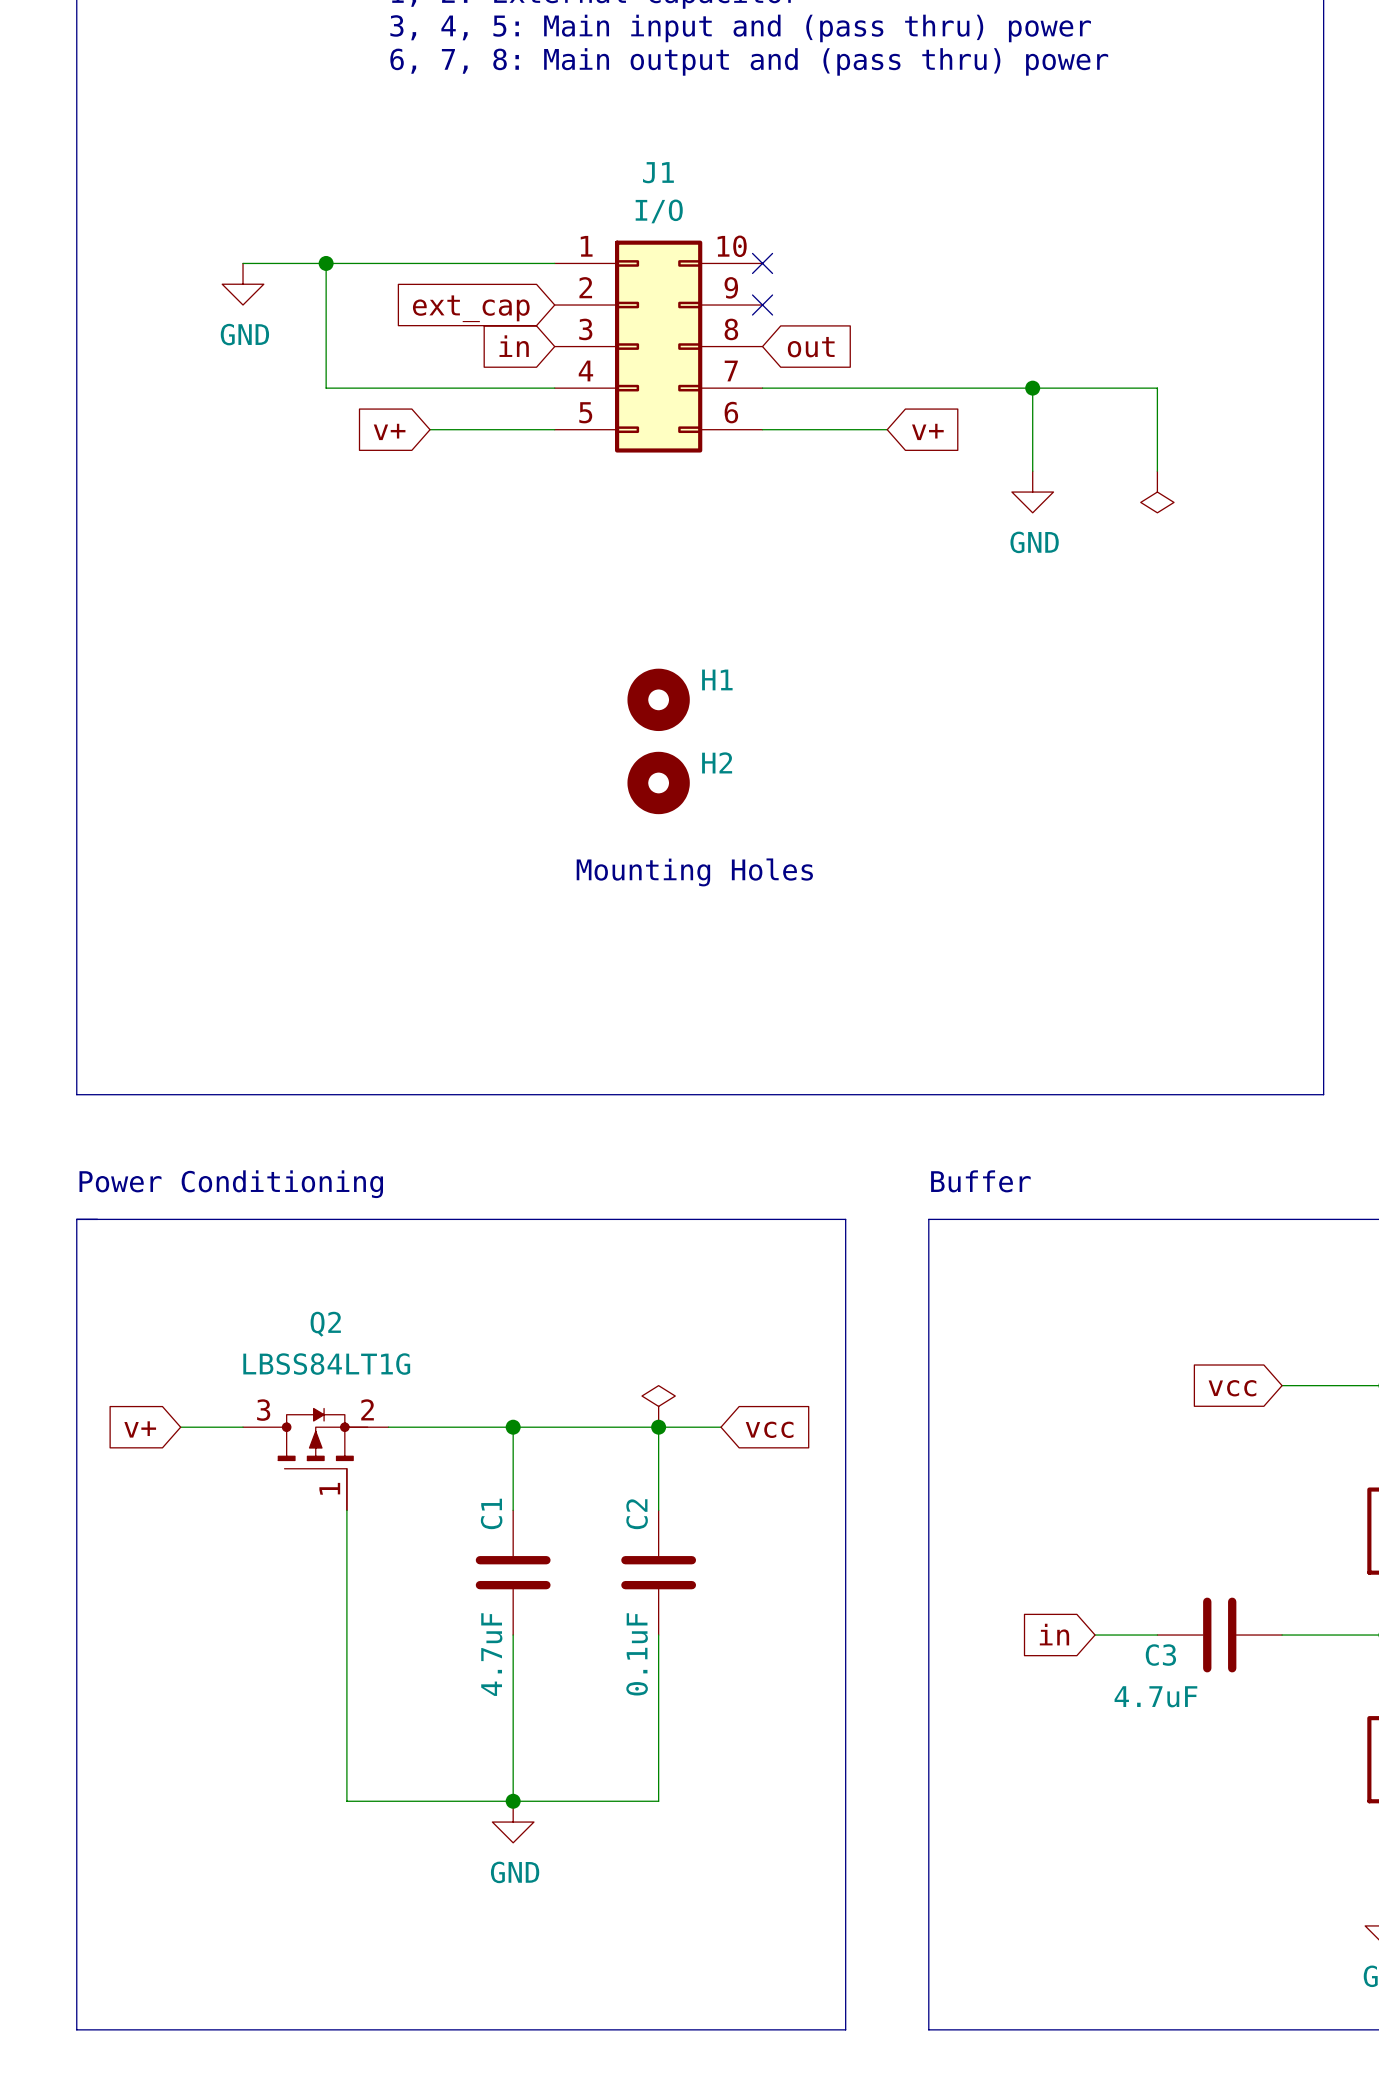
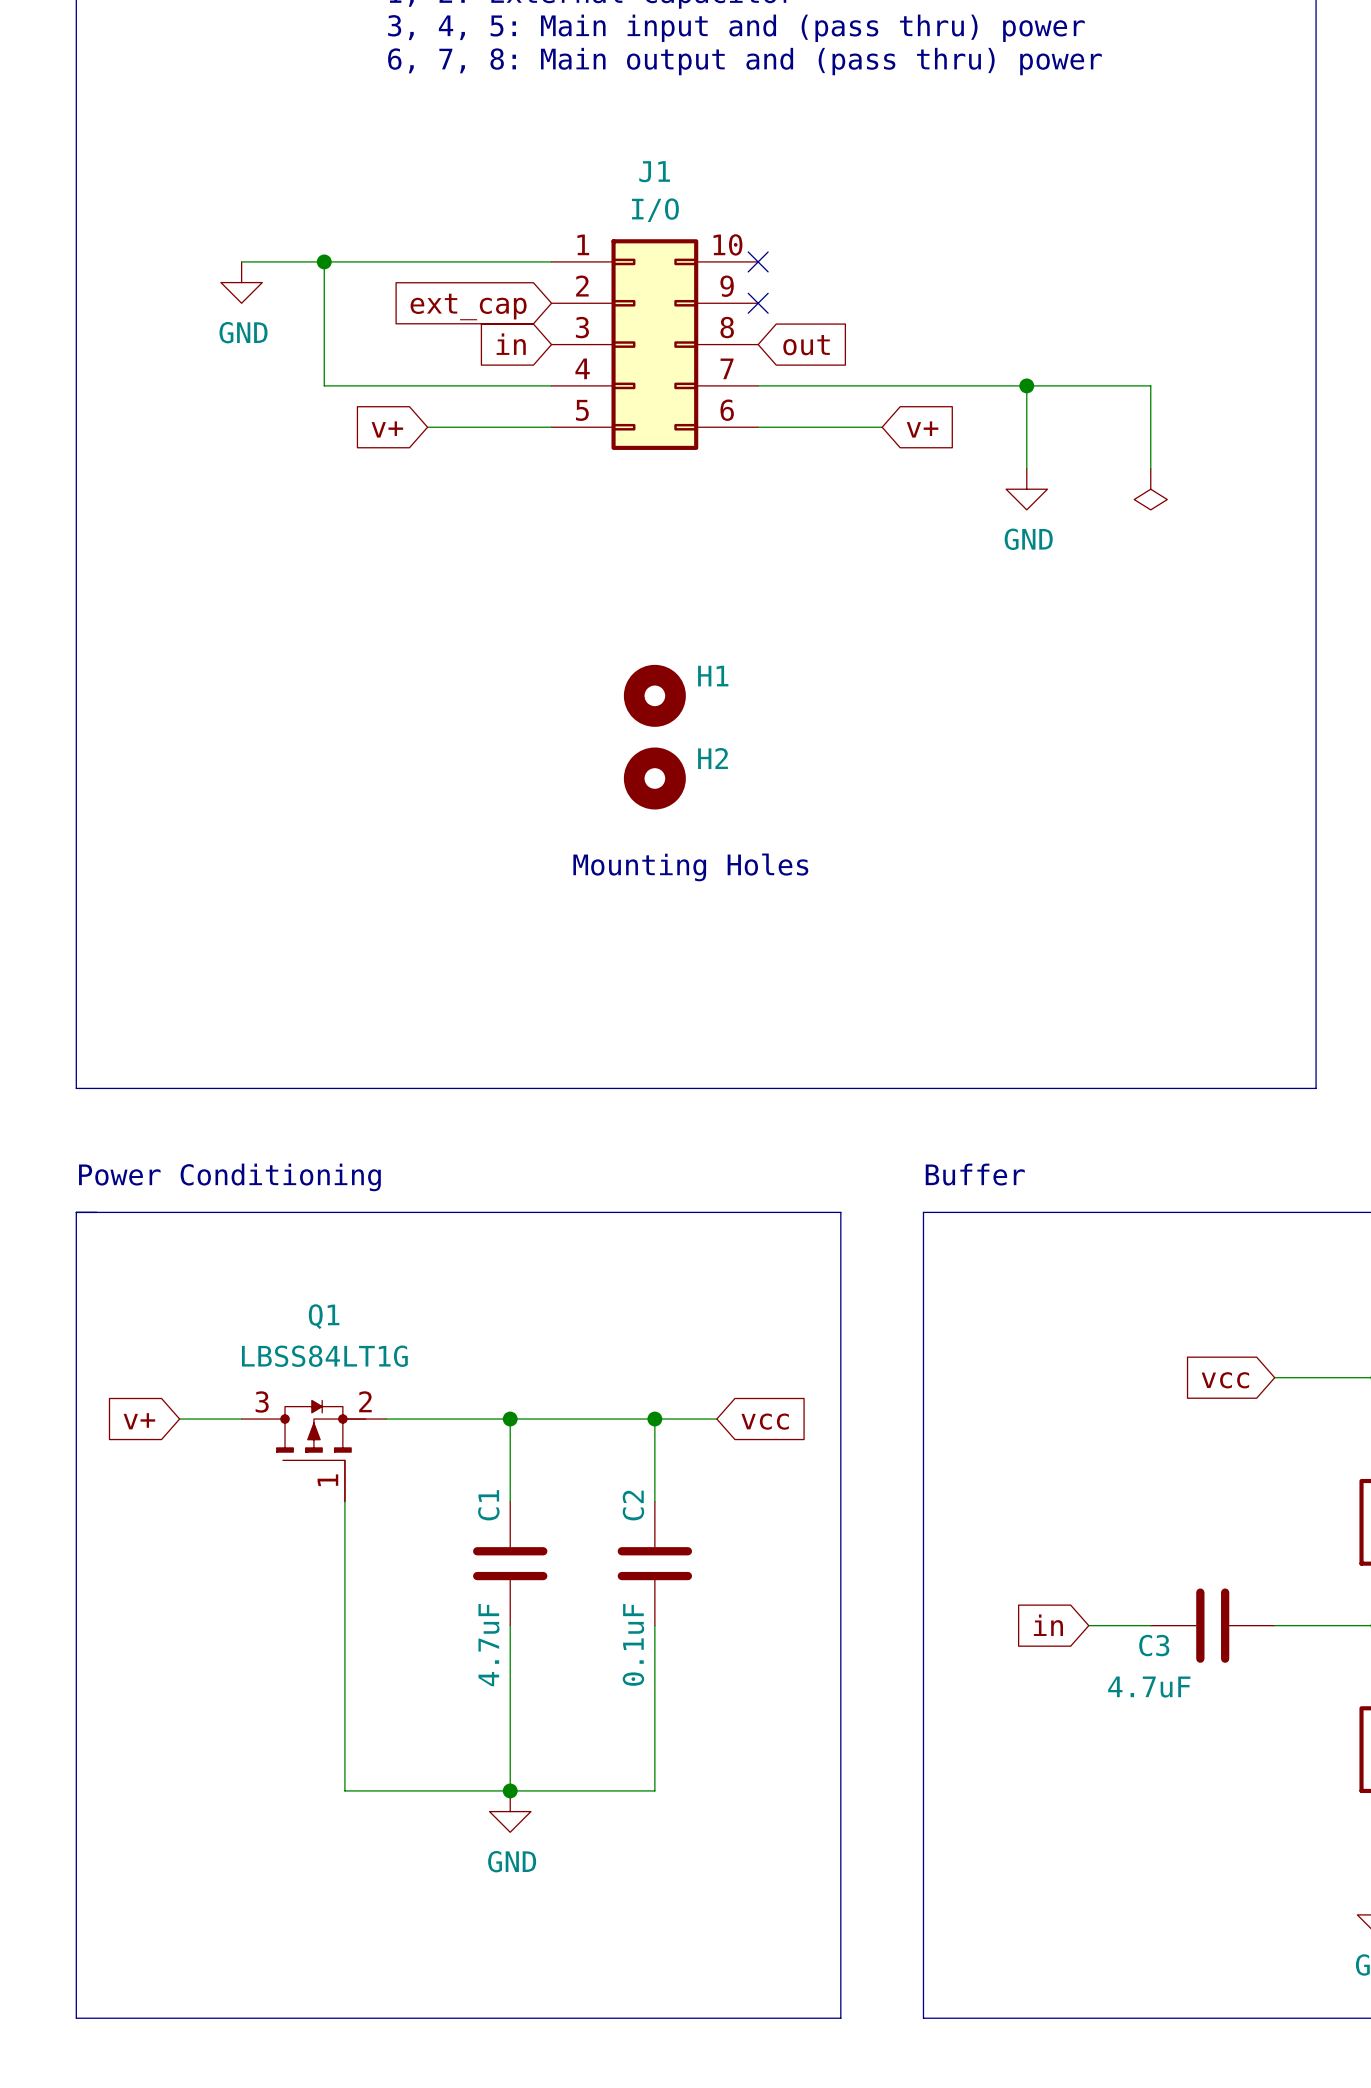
Q2 name: Q2 (325, 1324) -> Q1 (324, 1316)
power symbol: (658, 1406) -> none

